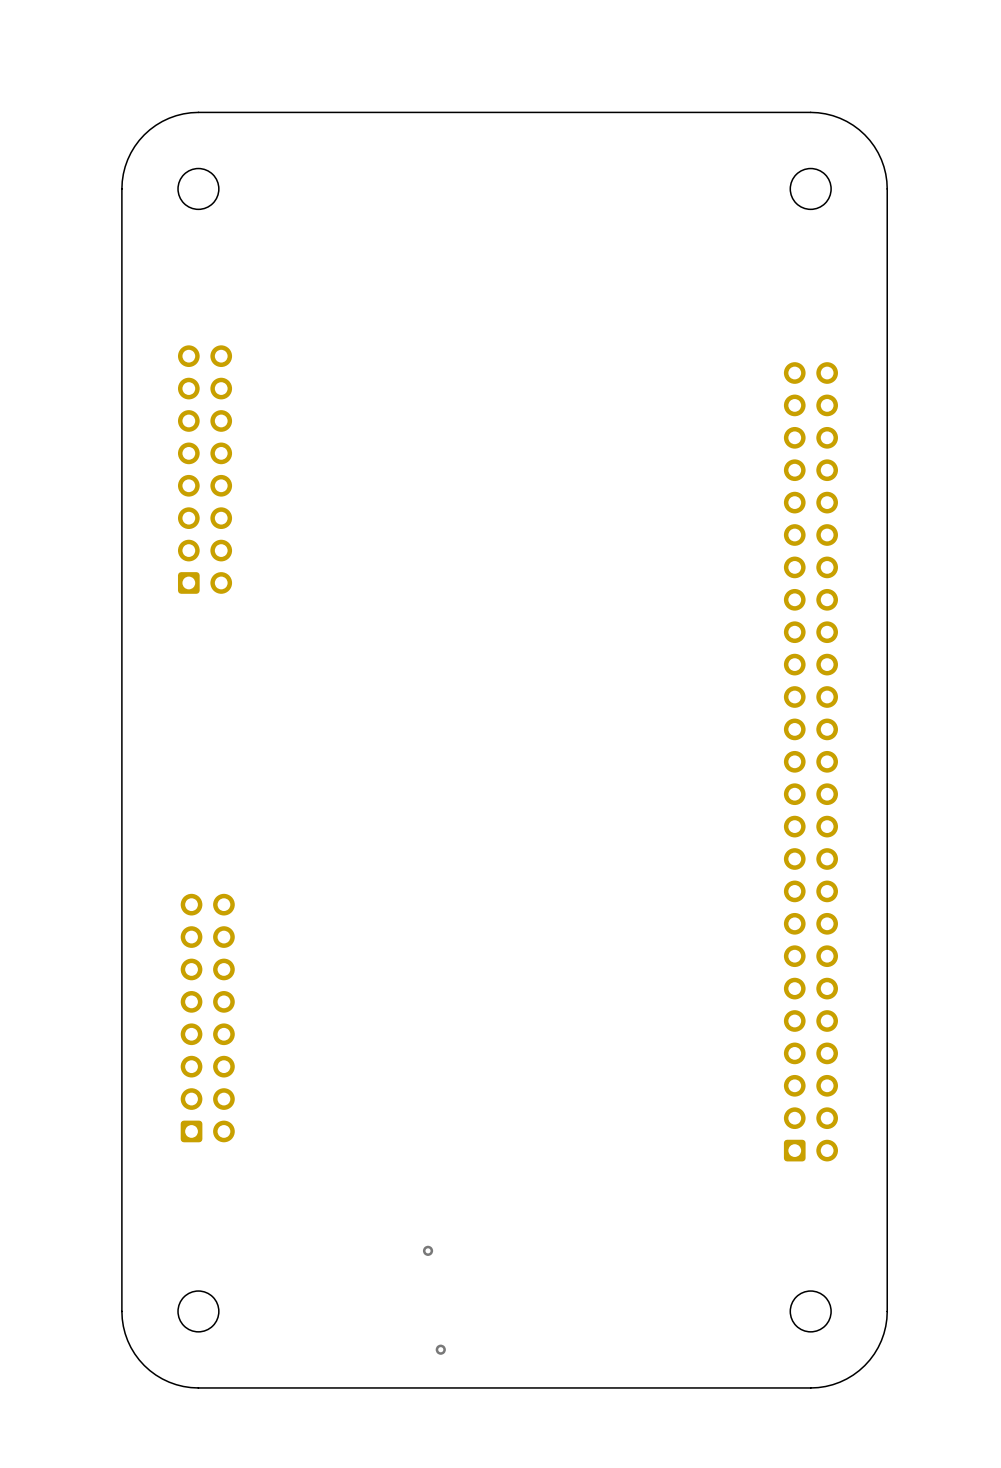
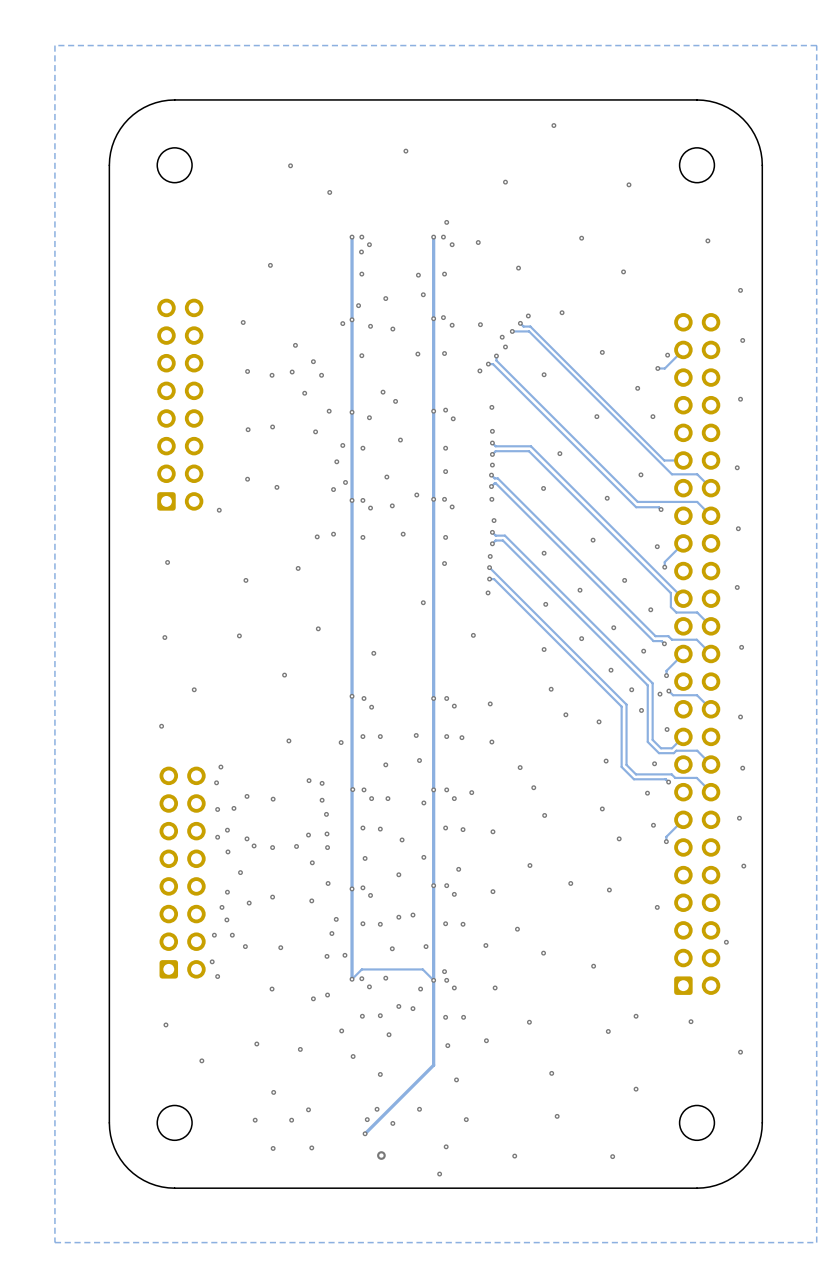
zone outline: none -> (816, 45) (816, 1242) (54, 1242) (54, 45) (816, 45)
via: none -> (553, 125)
via: none -> (405, 151)
via: none -> (290, 165)
via: none -> (505, 182)
via: none -> (628, 184)
via: none -> (329, 192)
via: none -> (446, 222)
track: none -> (352, 237) (352, 979) (361, 969) (422, 969) (433, 980)
via: none -> (352, 237)
via: none -> (361, 237)
track: none -> (433, 237) (433, 1065) (365, 1133)
via: none -> (433, 237)
via: none -> (443, 237)
via: none -> (581, 238)
via: none -> (707, 240)
via: none -> (478, 242)
via: none -> (369, 244)
via: none -> (452, 244)
via: none -> (361, 251)
via: none -> (270, 265)
via: none -> (518, 268)
via: none -> (623, 271)
via: none -> (361, 274)
via: none -> (444, 274)
via: none -> (418, 275)
via: none -> (740, 290)
via: none -> (423, 294)
via: none -> (385, 298)
via: none -> (358, 305)
via: none -> (562, 312)
via: none -> (528, 315)
via: none -> (443, 317)
via: none -> (433, 318)
via: none -> (352, 319)
via: none -> (243, 322)
via: none -> (342, 323)
track: none -> (520, 323) (523, 326) (530, 326) (664, 460) (683, 460)
via: none -> (520, 323)
via: none -> (480, 324)
via: none -> (452, 325)
via: none -> (370, 326)
via: none -> (392, 329)
track: none -> (512, 331) (529, 331) (671, 474) (697, 474) (711, 488)
via: none -> (512, 331)
via: none -> (502, 337)
via: none -> (742, 340)
via: none -> (295, 345)
via: none -> (505, 346)
track: none -> (683, 349) (664, 368) (657, 368)
via: none -> (602, 352)
via: none -> (444, 353)
via: none -> (417, 354)
via: none -> (667, 355)
via: none -> (361, 355)
track: none -> (496, 356) (496, 360) (637, 501) (697, 501) (711, 515)
via: none -> (496, 356)
via: none -> (313, 361)
track: none -> (488, 364) (492, 364) (636, 507) (658, 507)
via: none -> (488, 364)
via: none -> (657, 368)
via: none -> (247, 371)
via: none -> (479, 370)
via: none -> (292, 372)
via: none -> (544, 374)
via: none -> (272, 375)
via: none -> (321, 375)
via: none -> (637, 388)
via: none -> (383, 392)
via: none -> (304, 393)
via: none -> (740, 399)
via: none -> (395, 401)
via: none -> (491, 407)
via: none -> (445, 410)
via: none -> (329, 411)
via: none -> (433, 411)
via: none -> (352, 412)
via: none -> (596, 416)
via: none -> (652, 416)
via: none -> (369, 417)
via: none -> (453, 418)
via: none -> (272, 426)
via: none -> (248, 429)
via: none -> (492, 431)
via: none -> (315, 431)
via: none -> (400, 440)
track: none -> (492, 443) (495, 446) (530, 446) (683, 598)
via: none -> (492, 443)
via: none -> (342, 445)
via: none -> (362, 448)
via: none -> (445, 448)
via: none -> (559, 453)
track: none -> (492, 454) (495, 451) (528, 451) (670, 593) (670, 607) (676, 612) (697, 612) (711, 626)
via: none -> (492, 454)
via: none -> (336, 461)
via: none -> (492, 465)
via: none -> (737, 467)
via: none -> (445, 471)
via: none -> (640, 474)
track: none -> (491, 475) (497, 478) (655, 636) (668, 636) (671, 639) (696, 639) (711, 653)
via: none -> (491, 475)
via: none -> (386, 477)
via: none -> (247, 479)
via: none -> (345, 482)
track: none -> (491, 486) (495, 483) (653, 641) (661, 641) (664, 643)
via: none -> (491, 486)
via: none -> (276, 487)
via: none -> (543, 488)
via: none -> (333, 489)
via: none -> (416, 494)
via: none -> (607, 498)
via: none -> (433, 499)
via: none -> (444, 499)
via: none -> (491, 499)
via: none -> (352, 500)
via: none -> (362, 500)
via: none -> (392, 505)
via: none -> (452, 506)
via: none -> (370, 508)
via: none -> (661, 509)
via: none -> (219, 510)
via: none -> (494, 520)
via: none -> (738, 528)
track: none -> (492, 532) (495, 535) (504, 535) (652, 683) (652, 739) (661, 748) (672, 748) (683, 736)
via: none -> (492, 532)
via: none -> (333, 534)
via: none -> (403, 534)
via: none -> (317, 536)
via: none -> (362, 537)
via: none -> (445, 537)
via: none -> (593, 540)
track: none -> (492, 543) (495, 540) (502, 540) (647, 685) (647, 741) (658, 753) (697, 750) (711, 764)
via: none -> (492, 543)
track: none -> (683, 543) (664, 562) (664, 567)
via: none -> (657, 546)
via: none -> (544, 553)
via: none -> (490, 556)
via: none -> (167, 562)
via: none -> (444, 563)
track: none -> (489, 567) (626, 704) (626, 764) (635, 774) (671, 774) (675, 777) (696, 777) (711, 792)
via: none -> (489, 567)
via: none -> (664, 567)
via: none -> (298, 568)
track: none -> (489, 579) (494, 579) (621, 706) (621, 766) (633, 779) (665, 779) (668, 782)
via: none -> (489, 579)
via: none -> (245, 580)
via: none -> (624, 580)
via: none -> (737, 587)
via: none -> (580, 590)
via: none -> (488, 592)
via: none -> (423, 602)
via: none -> (545, 604)
via: none -> (650, 609)
via: none -> (613, 627)
via: none -> (318, 628)
via: none -> (473, 635)
via: none -> (239, 635)
via: none -> (164, 637)
via: none -> (581, 638)
via: none -> (664, 643)
via: none -> (741, 647)
via: none -> (544, 649)
via: none -> (643, 651)
via: none -> (373, 653)
track: none -> (683, 653) (666, 670) (666, 675)
via: none -> (611, 670)
via: none -> (284, 675)
via: none -> (666, 675)
via: none -> (194, 689)
via: none -> (551, 689)
via: none -> (631, 689)
track: none -> (668, 691) (673, 695) (697, 695) (711, 709)
via: none -> (668, 691)
via: none -> (660, 694)
via: none -> (352, 696)
via: none -> (364, 698)
via: none -> (433, 698)
via: none -> (446, 698)
via: none -> (490, 703)
via: none -> (454, 706)
via: none -> (371, 707)
via: none -> (641, 710)
via: none -> (565, 714)
via: none -> (740, 716)
via: none -> (599, 721)
via: none -> (161, 726)
via: none -> (667, 729)
via: none -> (416, 735)
via: none -> (362, 736)
via: none -> (380, 736)
via: none -> (446, 736)
via: none -> (461, 737)
via: none -> (288, 740)
via: none -> (491, 742)
via: none -> (341, 742)
via: none -> (419, 760)
via: none -> (606, 761)
via: none -> (654, 763)
via: none -> (385, 764)
via: none -> (220, 767)
via: none -> (520, 767)
via: none -> (742, 768)
via: none -> (309, 780)
via: none -> (668, 782)
via: none -> (216, 782)
via: none -> (322, 783)
via: none -> (533, 787)
via: none -> (352, 789)
via: none -> (364, 789)
via: none -> (433, 789)
via: none -> (446, 789)
via: none -> (471, 792)
via: none -> (647, 793)
via: none -> (247, 796)
via: none -> (273, 799)
via: none -> (371, 798)
via: none -> (387, 798)
via: none -> (454, 798)
via: none -> (322, 800)
via: none -> (423, 802)
via: none -> (233, 808)
via: none -> (602, 808)
via: none -> (217, 809)
via: none -> (326, 814)
via: none -> (544, 815)
via: none -> (739, 818)
track: none -> (683, 819) (666, 836) (666, 841)
via: none -> (653, 825)
via: none -> (362, 827)
via: none -> (445, 827)
via: none -> (380, 829)
via: none -> (463, 829)
via: none -> (227, 830)
via: none -> (492, 831)
via: none -> (327, 833)
via: none -> (308, 835)
via: none -> (217, 837)
via: none -> (247, 838)
via: none -> (619, 838)
via: none -> (402, 839)
via: none -> (666, 841)
via: none -> (254, 845)
via: none -> (296, 846)
via: none -> (272, 847)
via: none -> (327, 847)
via: none -> (227, 851)
via: none -> (423, 857)
via: none -> (365, 858)
via: none -> (312, 862)
via: none -> (529, 865)
via: none -> (743, 866)
via: none -> (458, 869)
via: none -> (240, 872)
via: none -> (398, 874)
via: none -> (328, 883)
via: none -> (570, 883)
via: none -> (433, 885)
via: none -> (446, 885)
via: none -> (362, 887)
via: none -> (352, 888)
via: none -> (609, 890)
via: none -> (492, 891)
via: none -> (227, 892)
via: none -> (454, 894)
via: none -> (370, 895)
via: none -> (272, 897)
via: none -> (311, 900)
via: none -> (249, 903)
via: none -> (221, 907)
via: none -> (657, 907)
via: none -> (412, 915)
via: none -> (398, 917)
via: none -> (336, 919)
via: none -> (226, 919)
via: none -> (362, 923)
via: none -> (380, 924)
via: none -> (445, 923)
via: none -> (463, 924)
via: none -> (517, 929)
via: none -> (331, 933)
via: none -> (214, 935)
via: none -> (232, 935)
via: none -> (726, 942)
via: none -> (485, 945)
via: none -> (245, 946)
via: none -> (426, 946)
via: none -> (280, 947)
via: none -> (392, 948)
via: none -> (543, 953)
via: none -> (344, 955)
via: none -> (327, 956)
via: none -> (212, 961)
via: none -> (593, 966)
via: none -> (444, 971)
via: none -> (217, 976)
via: none -> (385, 978)
via: none -> (361, 978)
via: none -> (352, 979)
via: none -> (433, 980)
via: none -> (446, 980)
via: none -> (369, 986)
via: none -> (454, 987)
via: none -> (495, 987)
via: none -> (272, 989)
via: none -> (420, 989)
via: none -> (327, 995)
via: none -> (313, 998)
via: none -> (398, 1006)
via: none -> (412, 1008)
via: none -> (380, 1015)
via: none -> (362, 1016)
via: none -> (636, 1016)
via: none -> (445, 1017)
via: none -> (463, 1017)
via: none -> (691, 1021)
via: none -> (529, 1022)
via: none -> (165, 1024)
via: none -> (341, 1030)
via: none -> (608, 1031)
via: none -> (389, 1034)
via: none -> (486, 1040)
via: none -> (256, 1044)
via: none -> (447, 1045)
via: none -> (300, 1049)
via: none -> (740, 1052)
via: none -> (353, 1056)
via: none -> (201, 1060)
via: (428, 1250) -> none
via: none -> (551, 1073)
via: none -> (380, 1074)
via: none -> (456, 1079)
via: none -> (636, 1089)
via: none -> (273, 1092)
via: none -> (377, 1109)
via: none -> (419, 1109)
via: none -> (308, 1109)
via: none -> (557, 1116)
via: none -> (367, 1119)
via: none -> (466, 1119)
via: none -> (255, 1120)
via: none -> (291, 1120)
via: none -> (392, 1123)
via: none -> (365, 1133)
via: none -> (446, 1146)
via: none -> (311, 1147)
via: none -> (273, 1148)
via: none -> (514, 1156)
via: none -> (612, 1156)
via: none -> (439, 1174)

